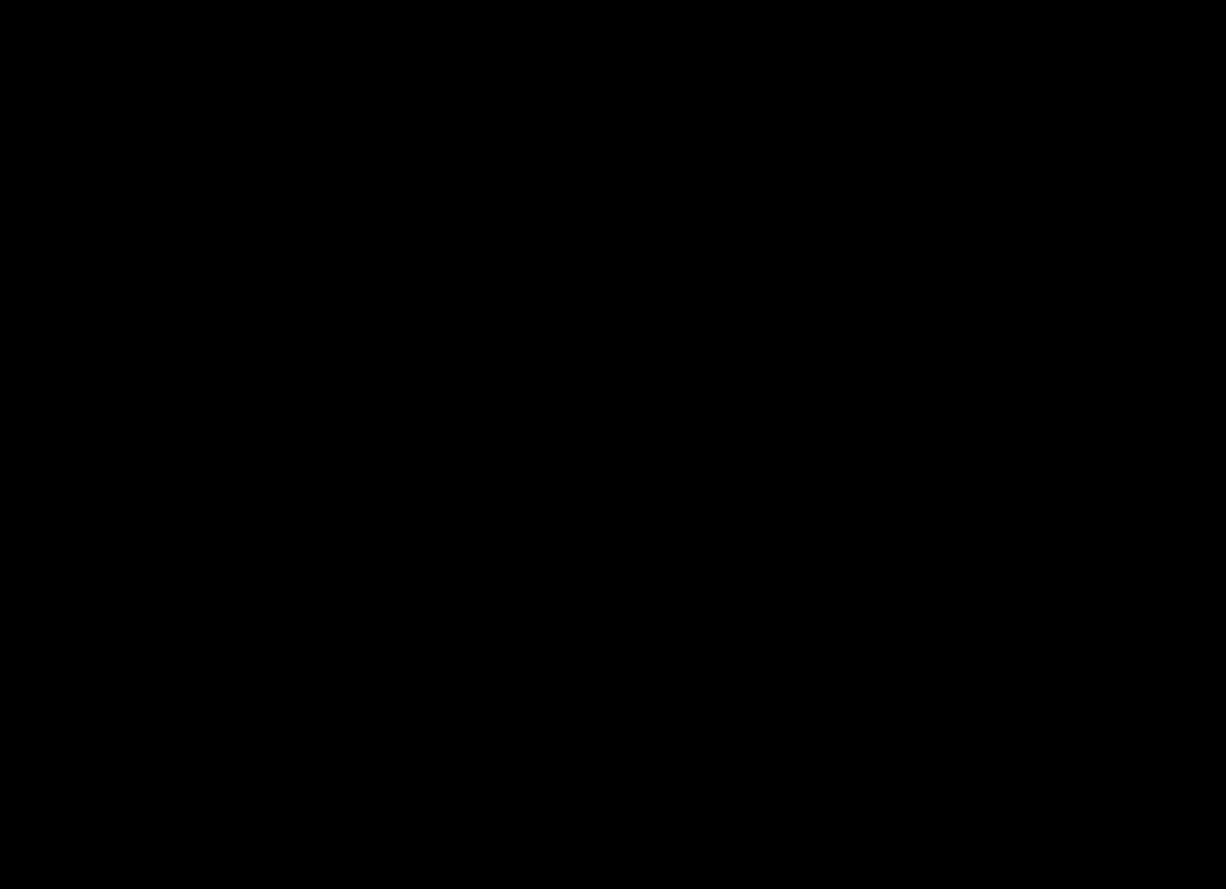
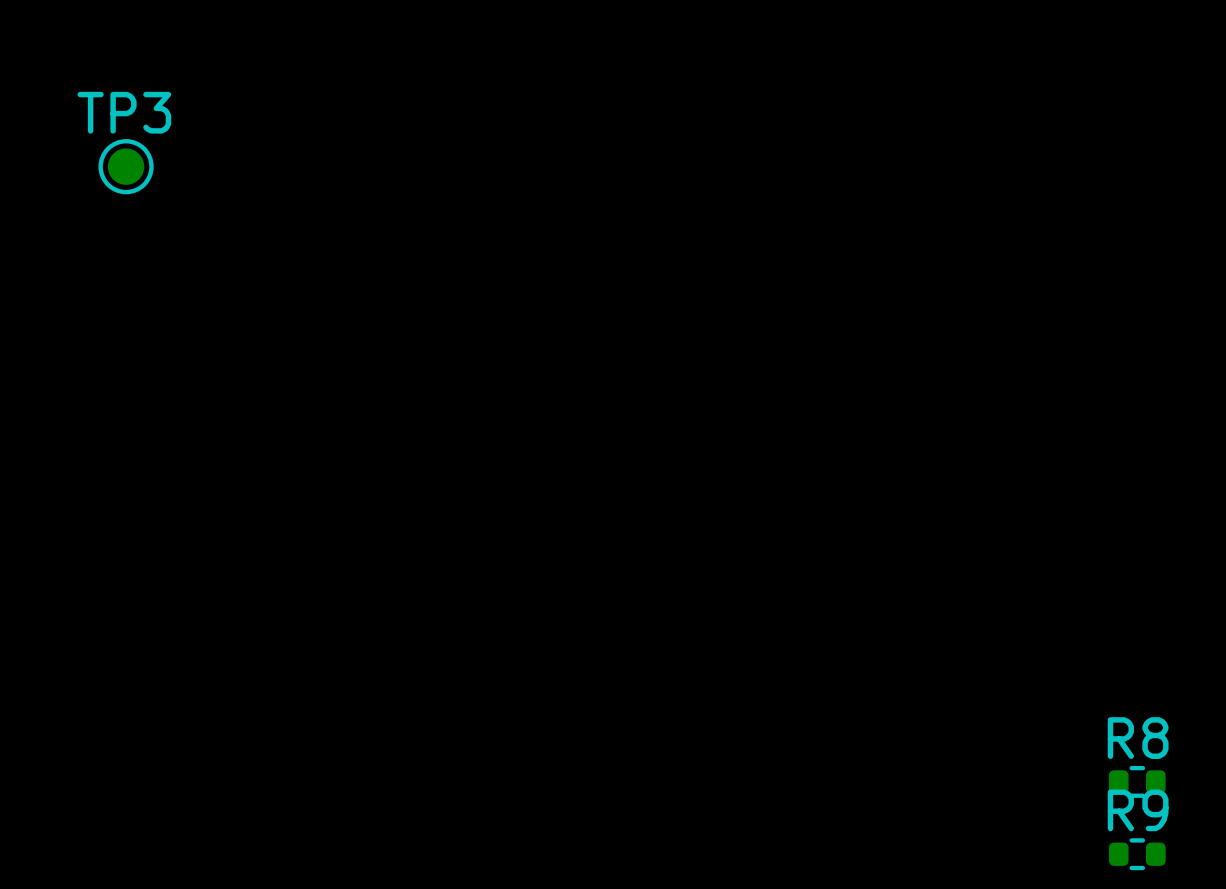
TP3: none -> (126, 166)
R8: none -> (1137, 781)
R9: none -> (1137, 854)

